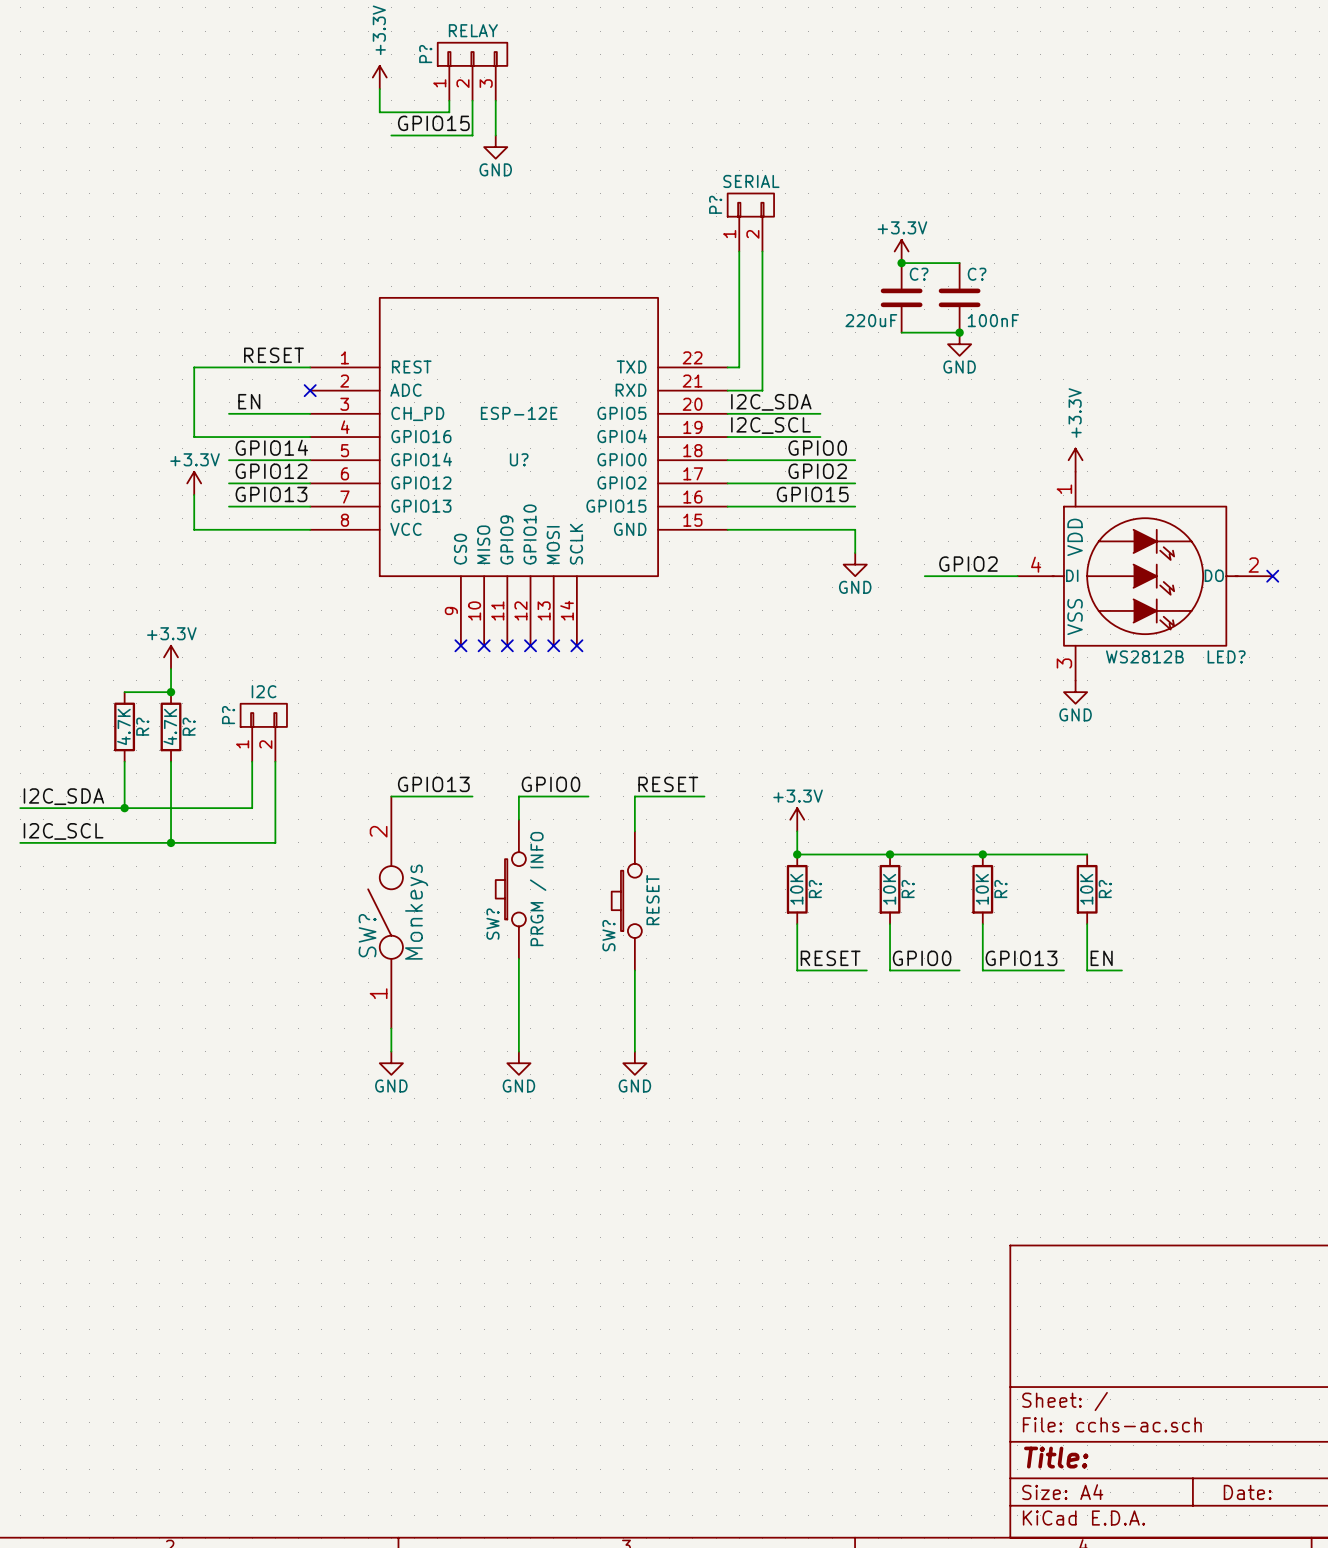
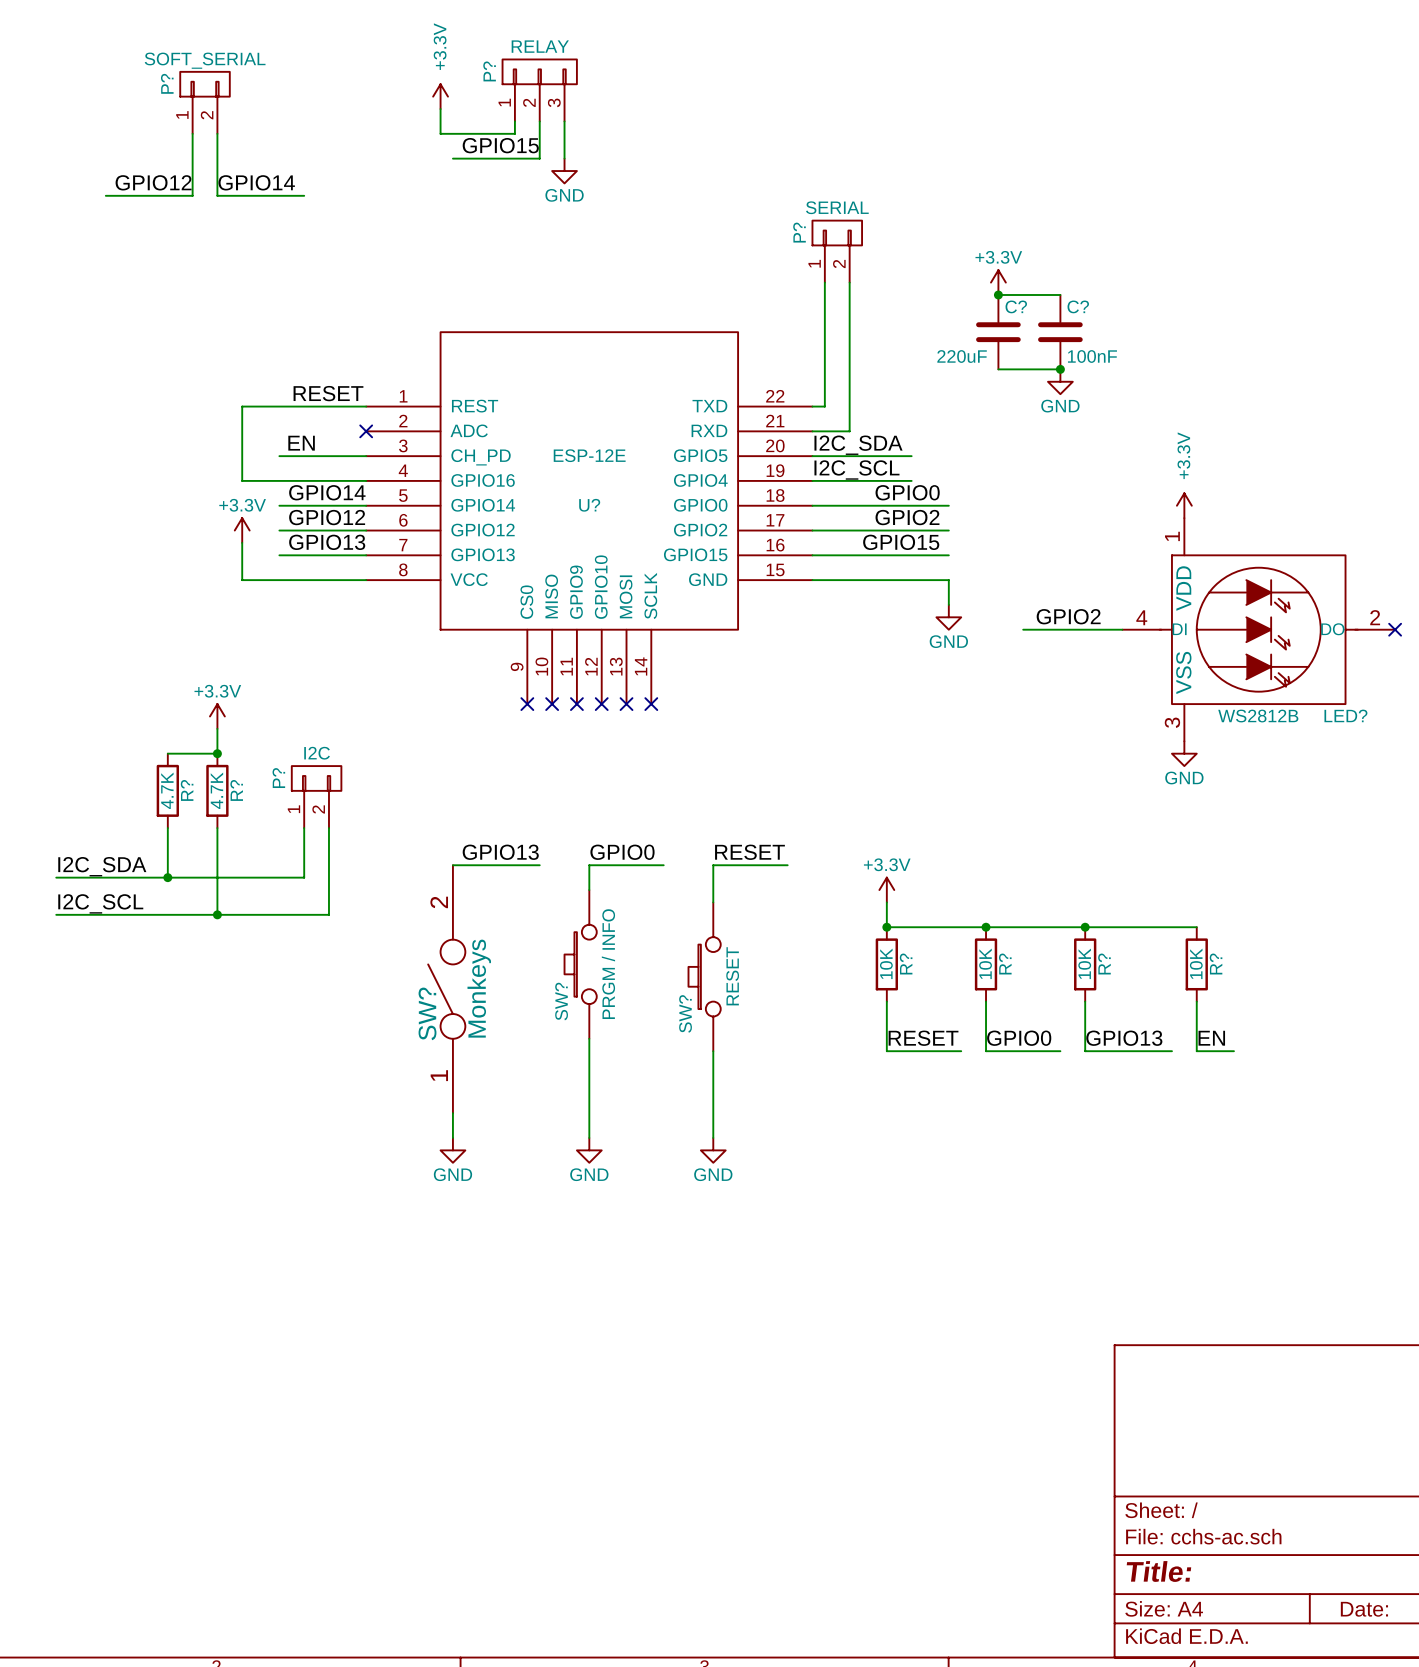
P?: none -> SOFT_SERIAL (205, 102)
wire: none -> (192, 133) (192, 195) (105, 195)
wire: none -> (217, 133) (217, 195) (304, 195)
label: none -> GPIO14 (256, 182)
label: none -> GPIO12 (153, 182)

